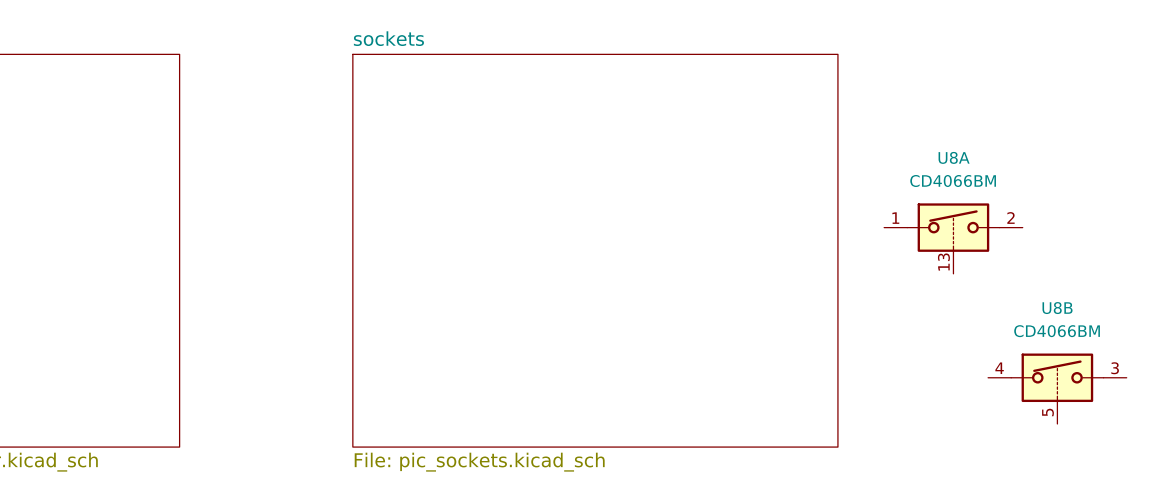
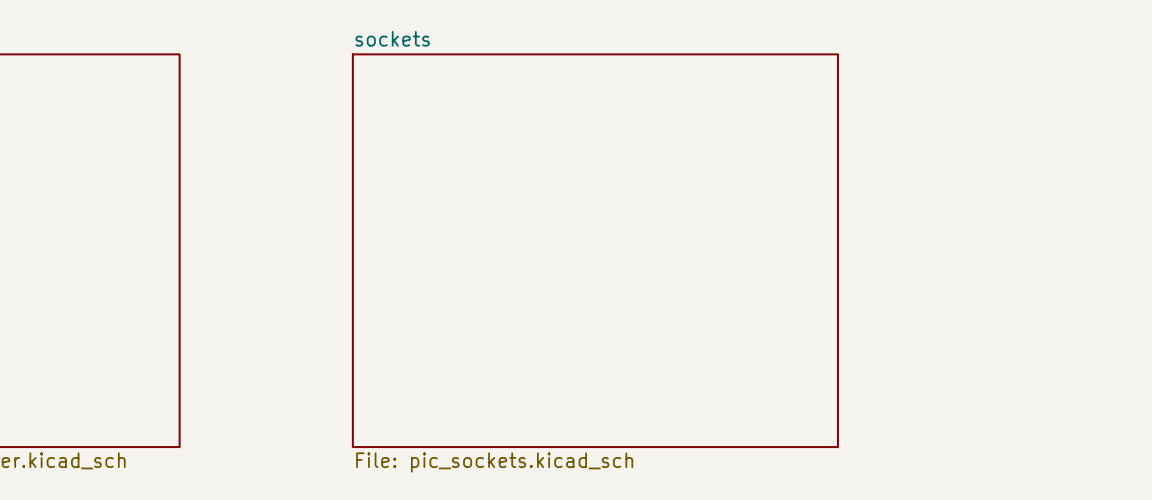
U8A: CD4066BM (953, 238) -> none
U8B: CD4066BM (1057, 388) -> none

